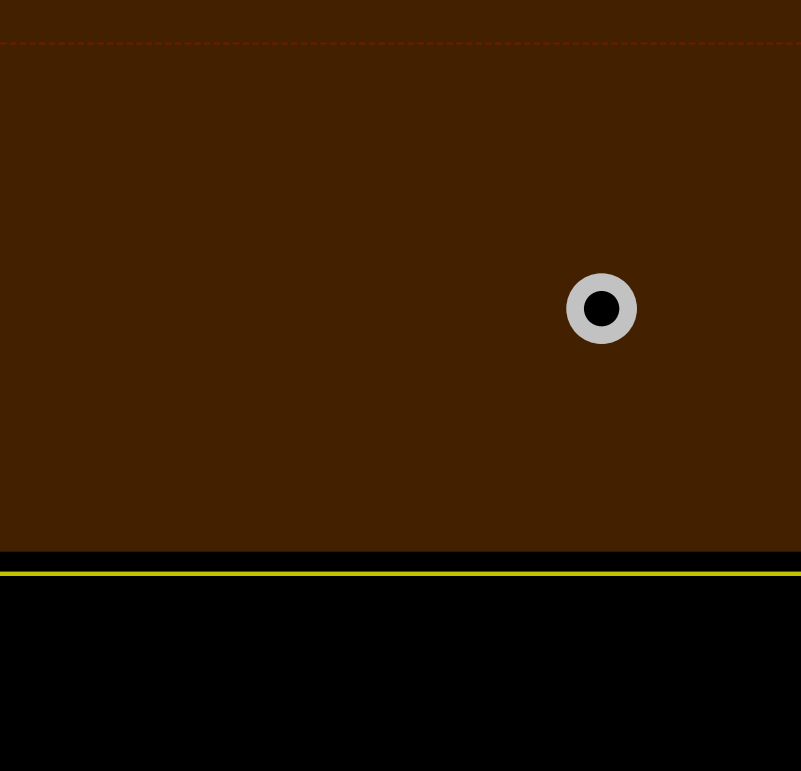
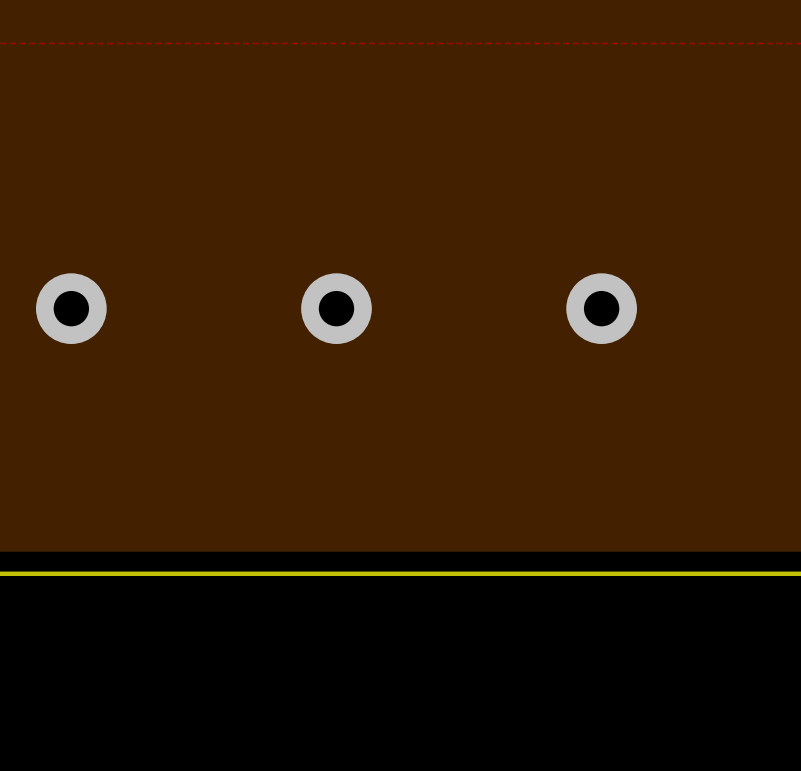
via: none -> (71, 308)
via: none -> (336, 308)

